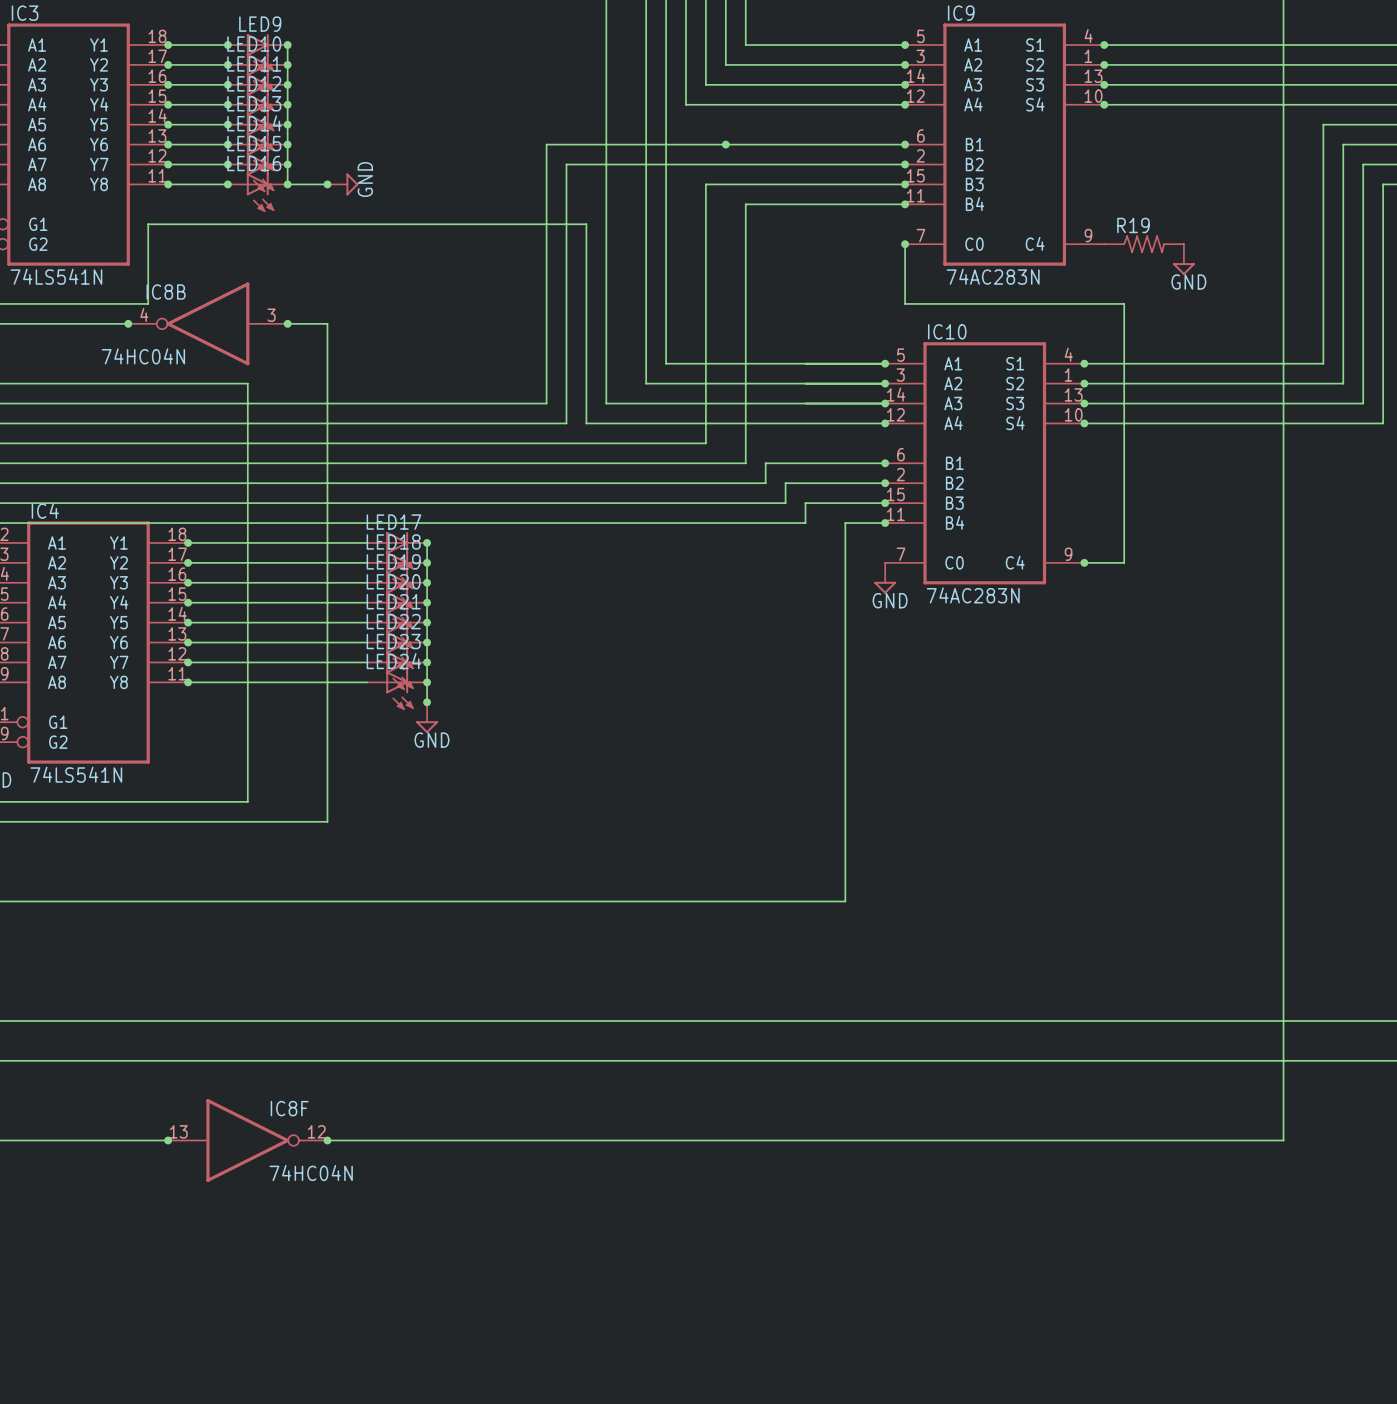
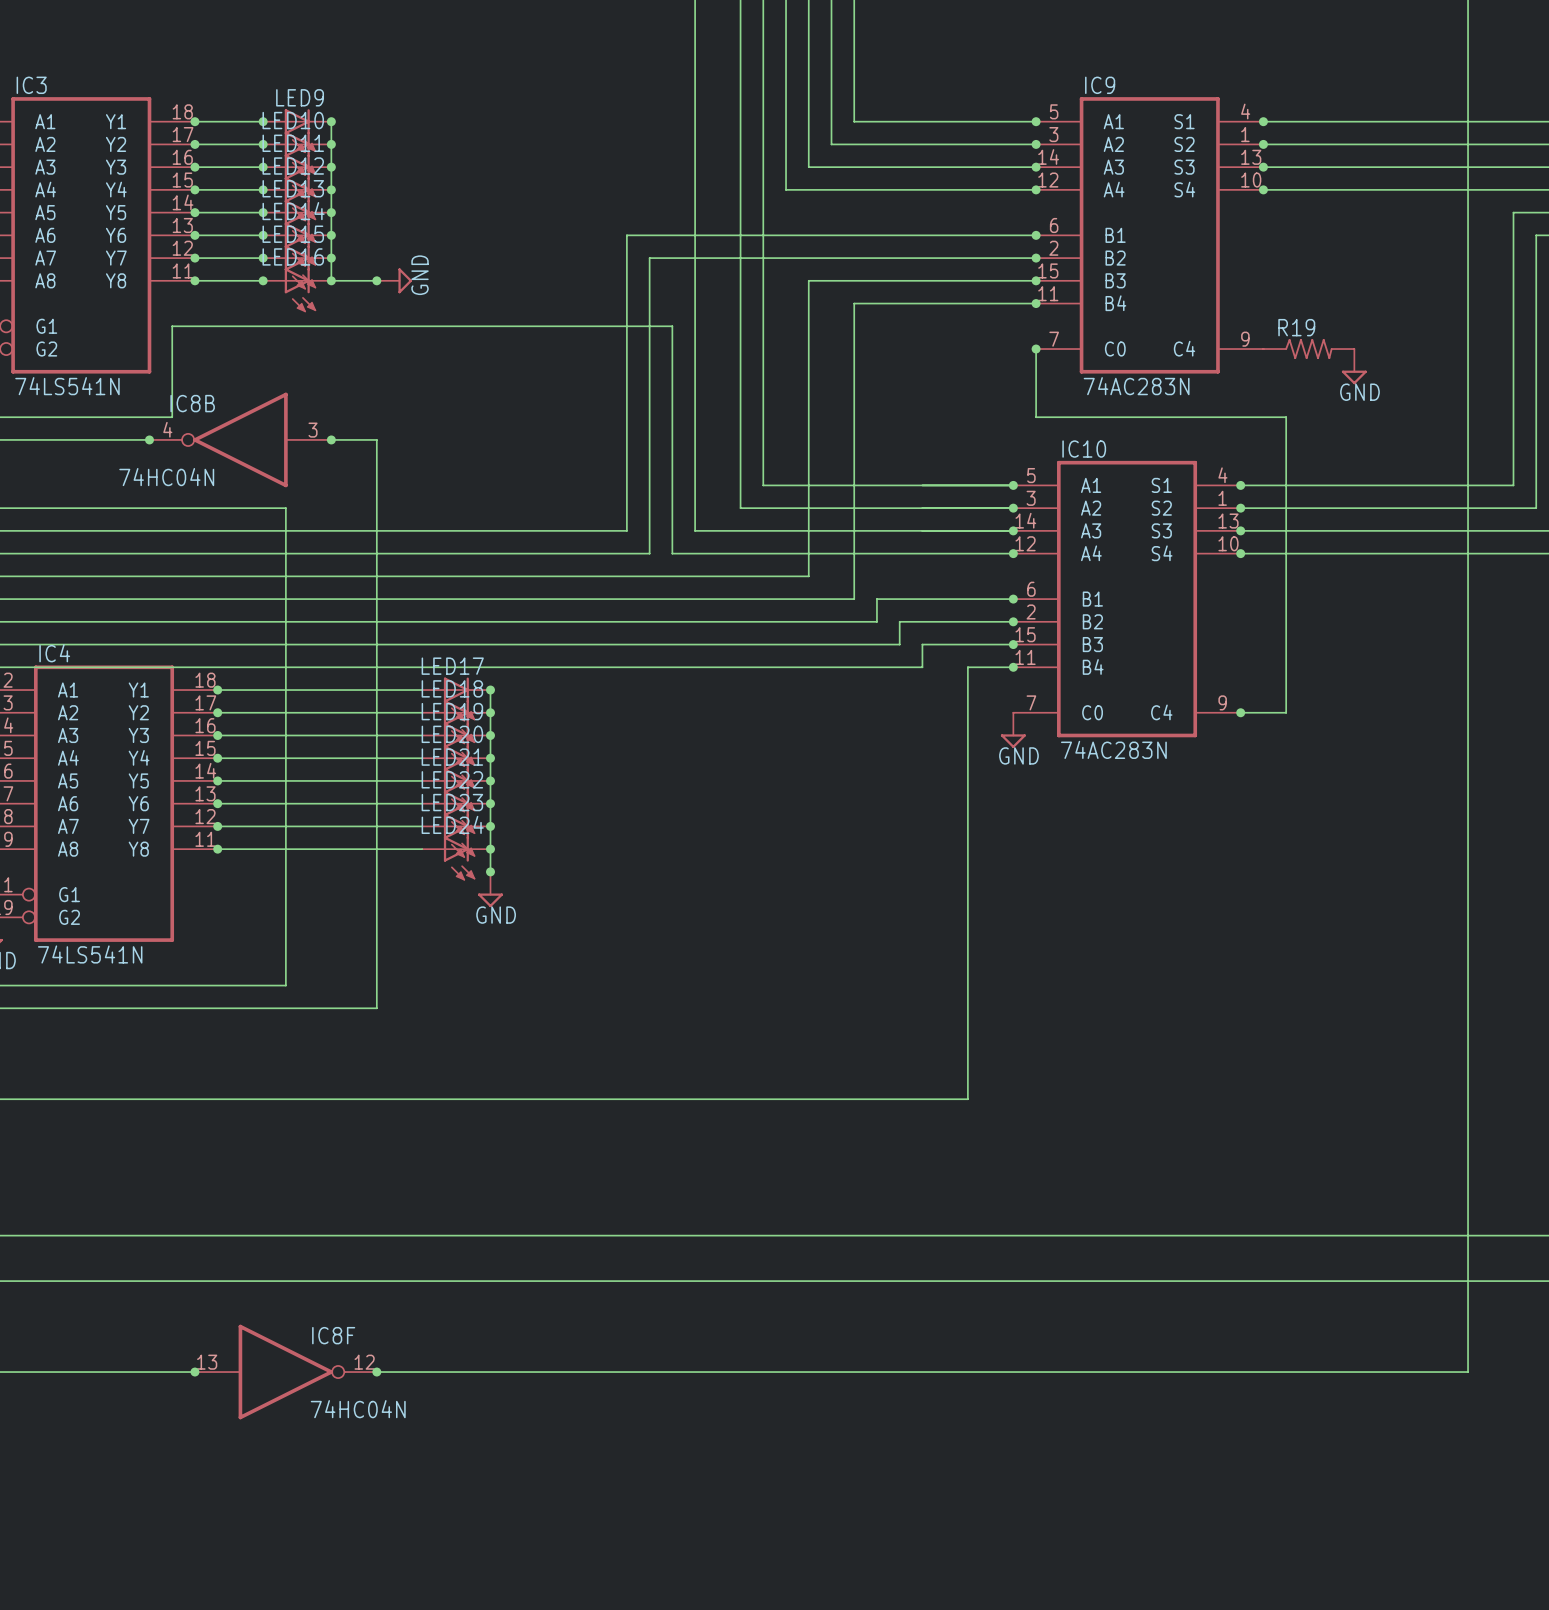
junction: (725, 144) -> none

